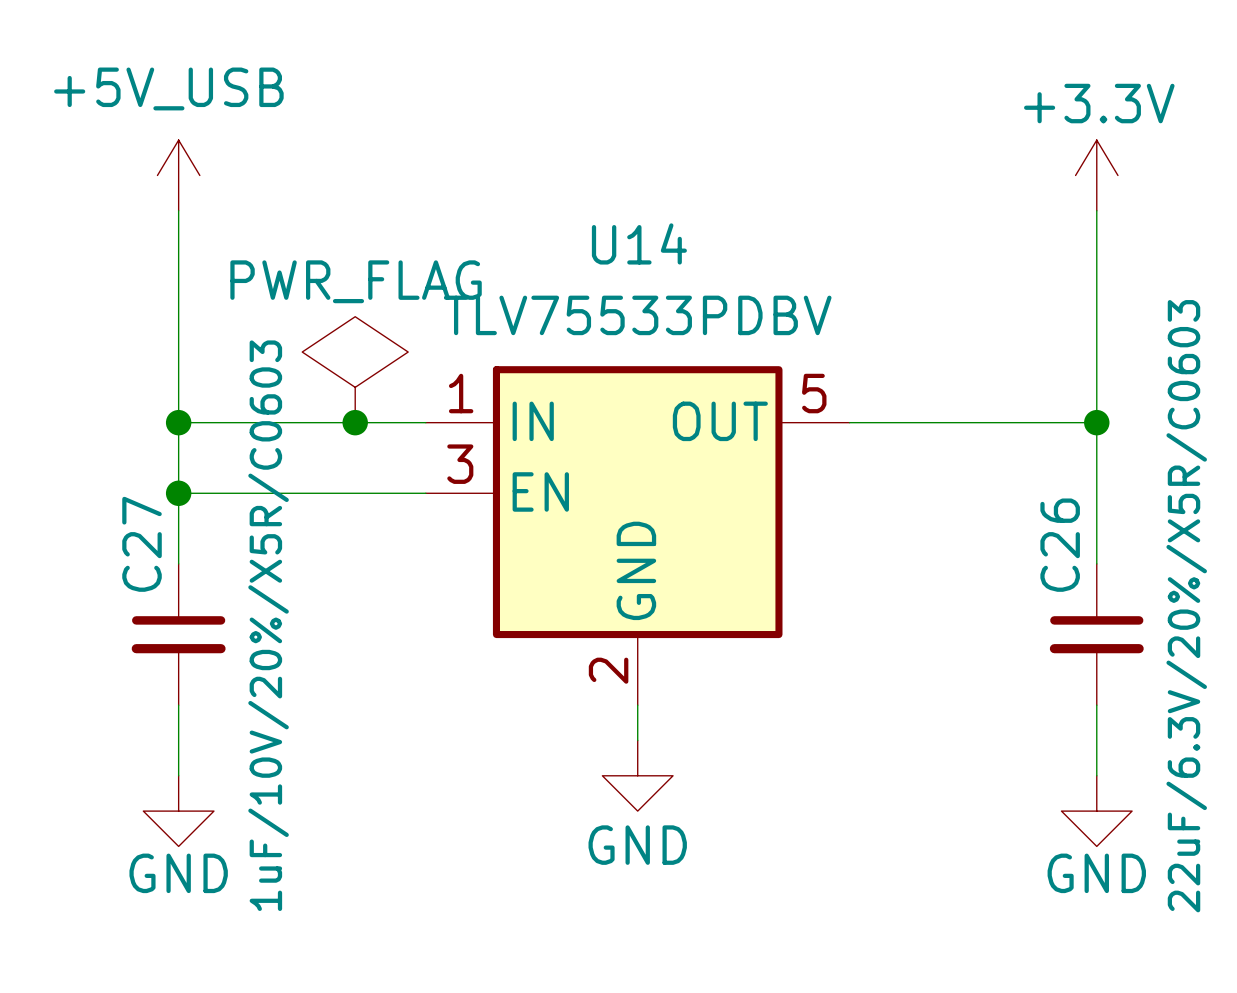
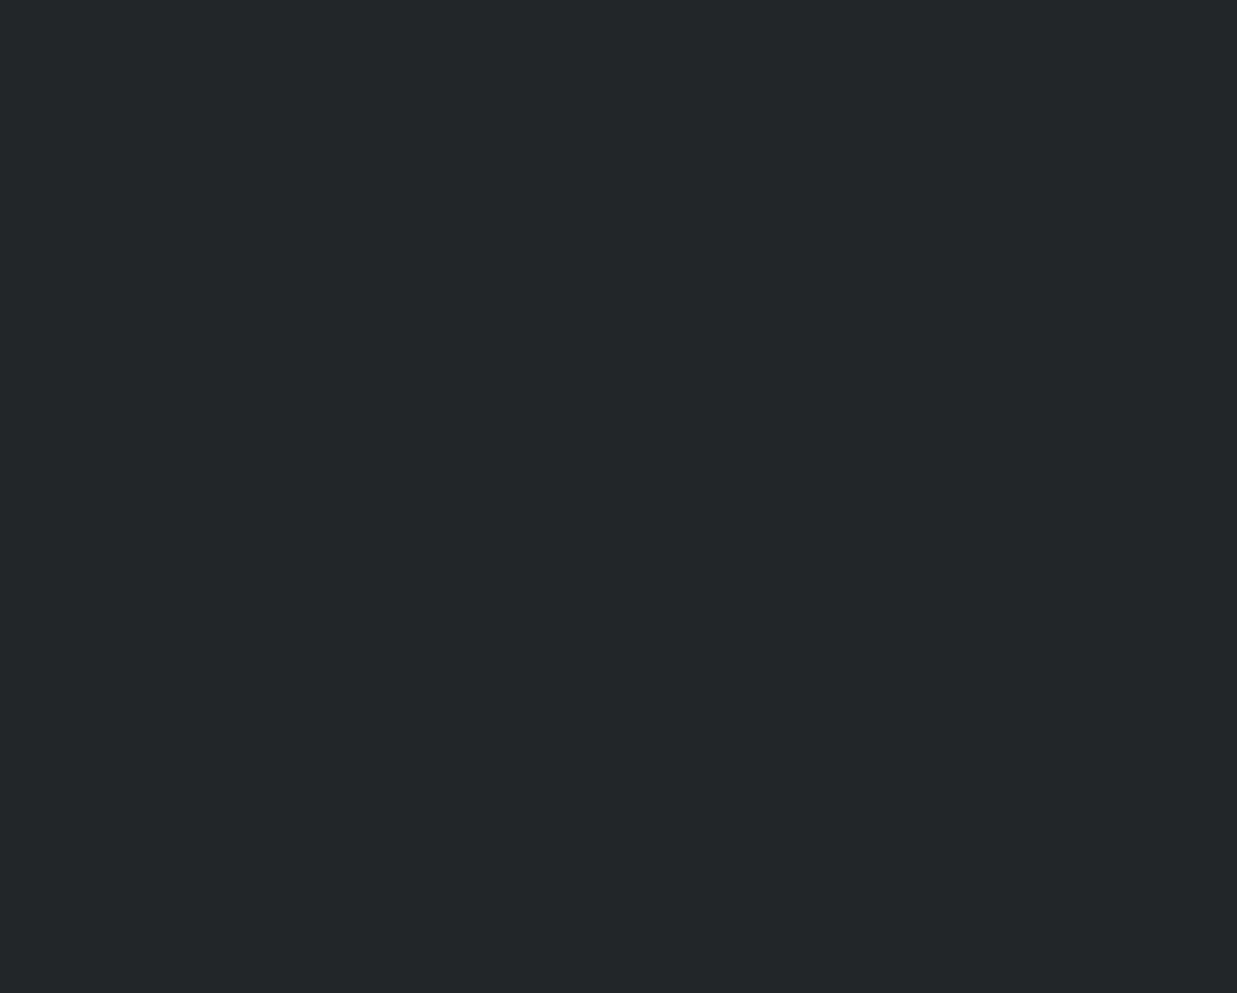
power symbol: +5V_USB (178, 175) -> none
power symbol: +3.3V (1096, 175) -> none
wire: (178, 210) (178, 563) -> none
wire: (1096, 210) (1096, 563) -> none
power symbol: PWR_FLAG (355, 369) -> none
wire: (178, 422) (425, 422) -> none
junction: (178, 422) -> none
junction: (355, 422) -> none
wire: (849, 422) (1096, 422) -> none
junction: (1096, 422) -> none
wire: (178, 493) (425, 493) -> none
junction: (178, 493) -> none
U14: TLV75533PDBV (637, 535) -> none
C27: 1uF/10V/20%/X5R/C0603 (178, 634) -> none
C26: 22uF/6.3V/20%/X5R/C0603 (1096, 634) -> none
wire: (178, 705) (178, 775) -> none
wire: (637, 705) (637, 740) -> none
wire: (1096, 705) (1096, 775) -> none
power symbol: GND (637, 775) -> none
power symbol: GND (178, 811) -> none
power symbol: GND (1096, 811) -> none

